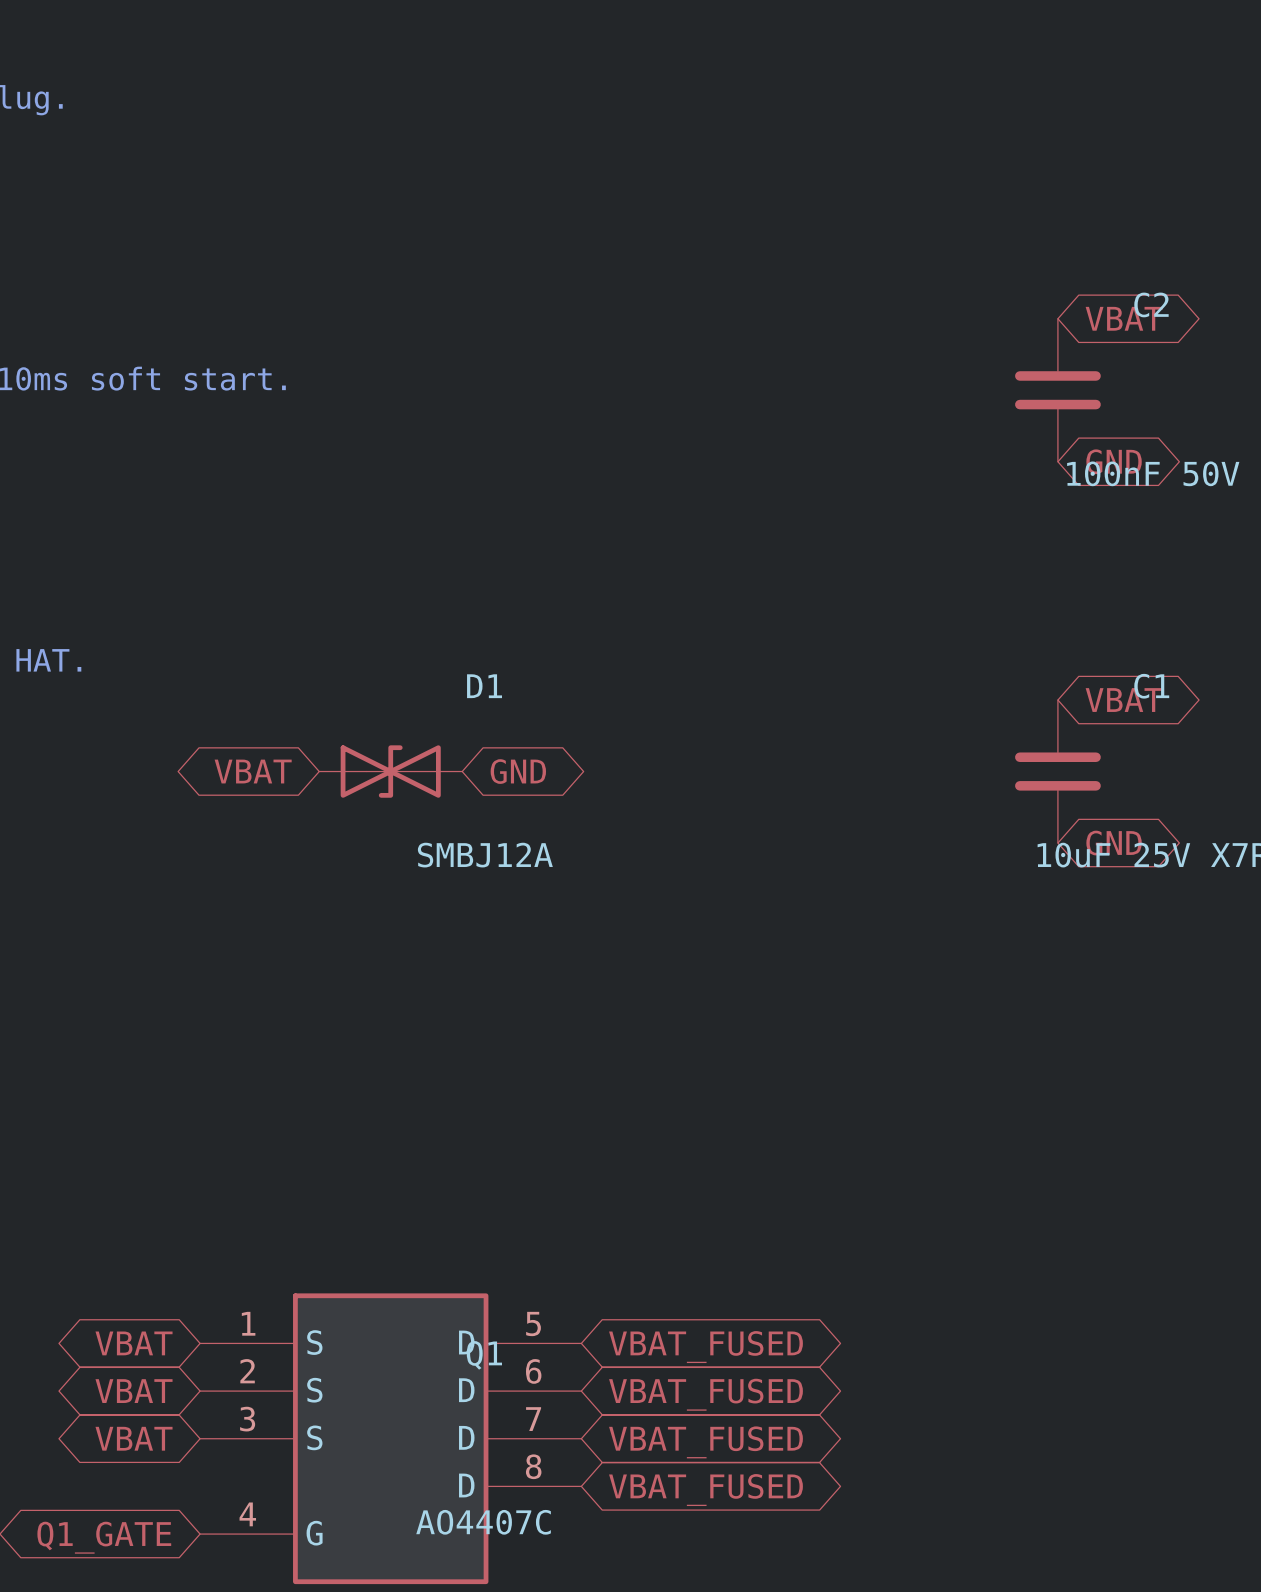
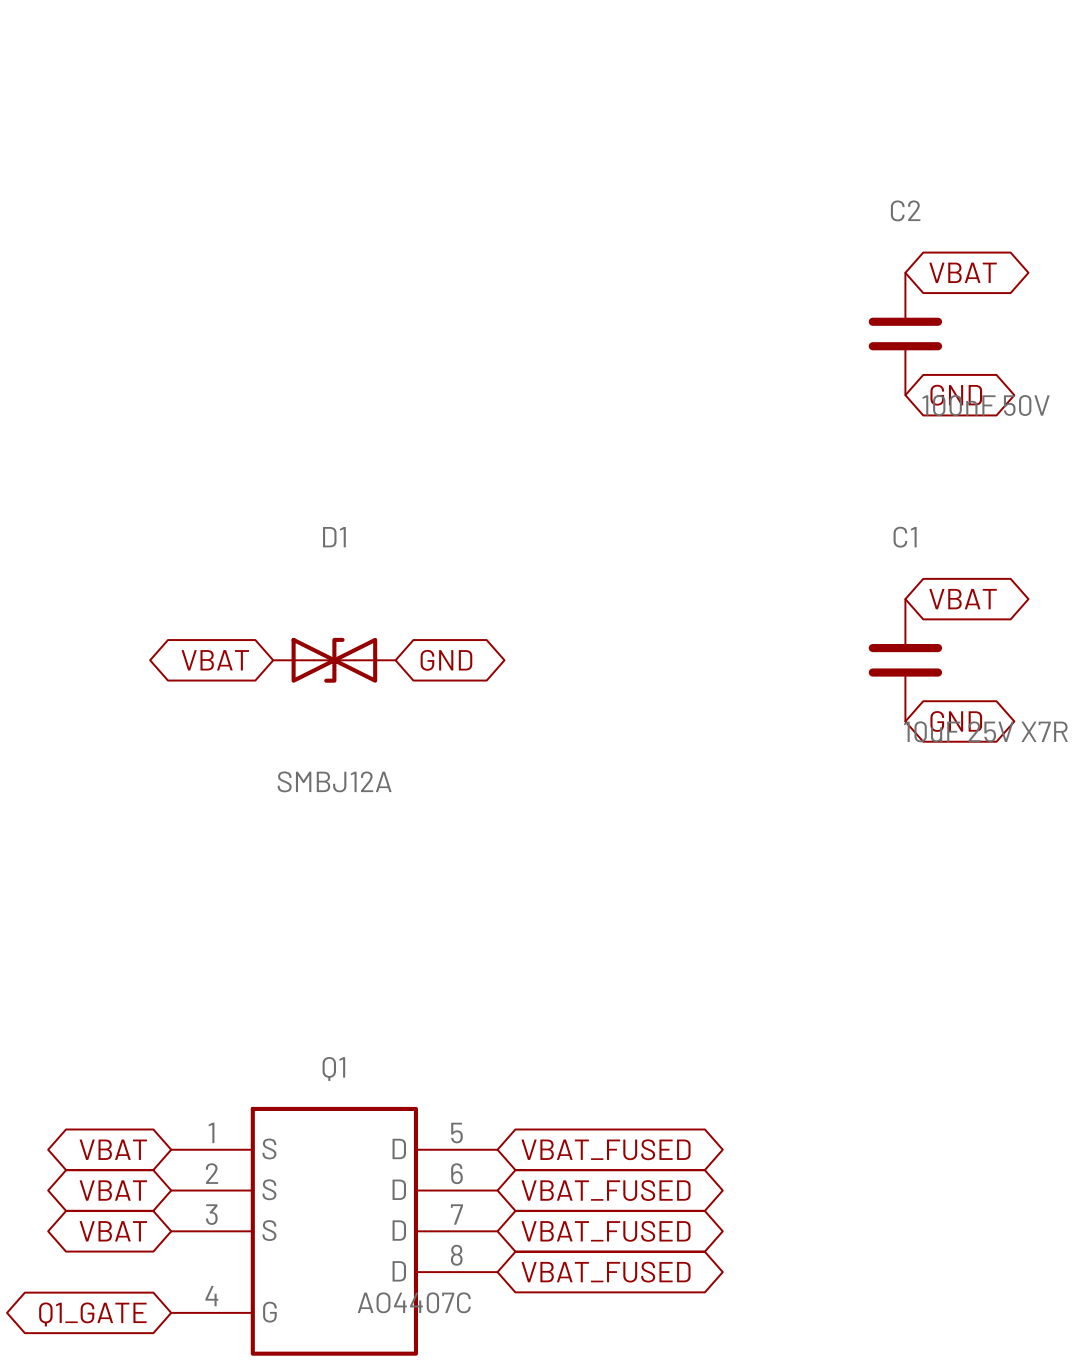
C2 name position: C2 (1151, 304) -> C2 (905, 210)
D1 name position: D1 (484, 686) -> D1 (334, 537)
C1 name position: C1 (1151, 686) -> C1 (905, 537)
D1 value position: SMBJ12A (485, 855) -> SMBJ12A (334, 781)
Q1 name position: Q1 (484, 1355) -> Q1 (333, 1068)

